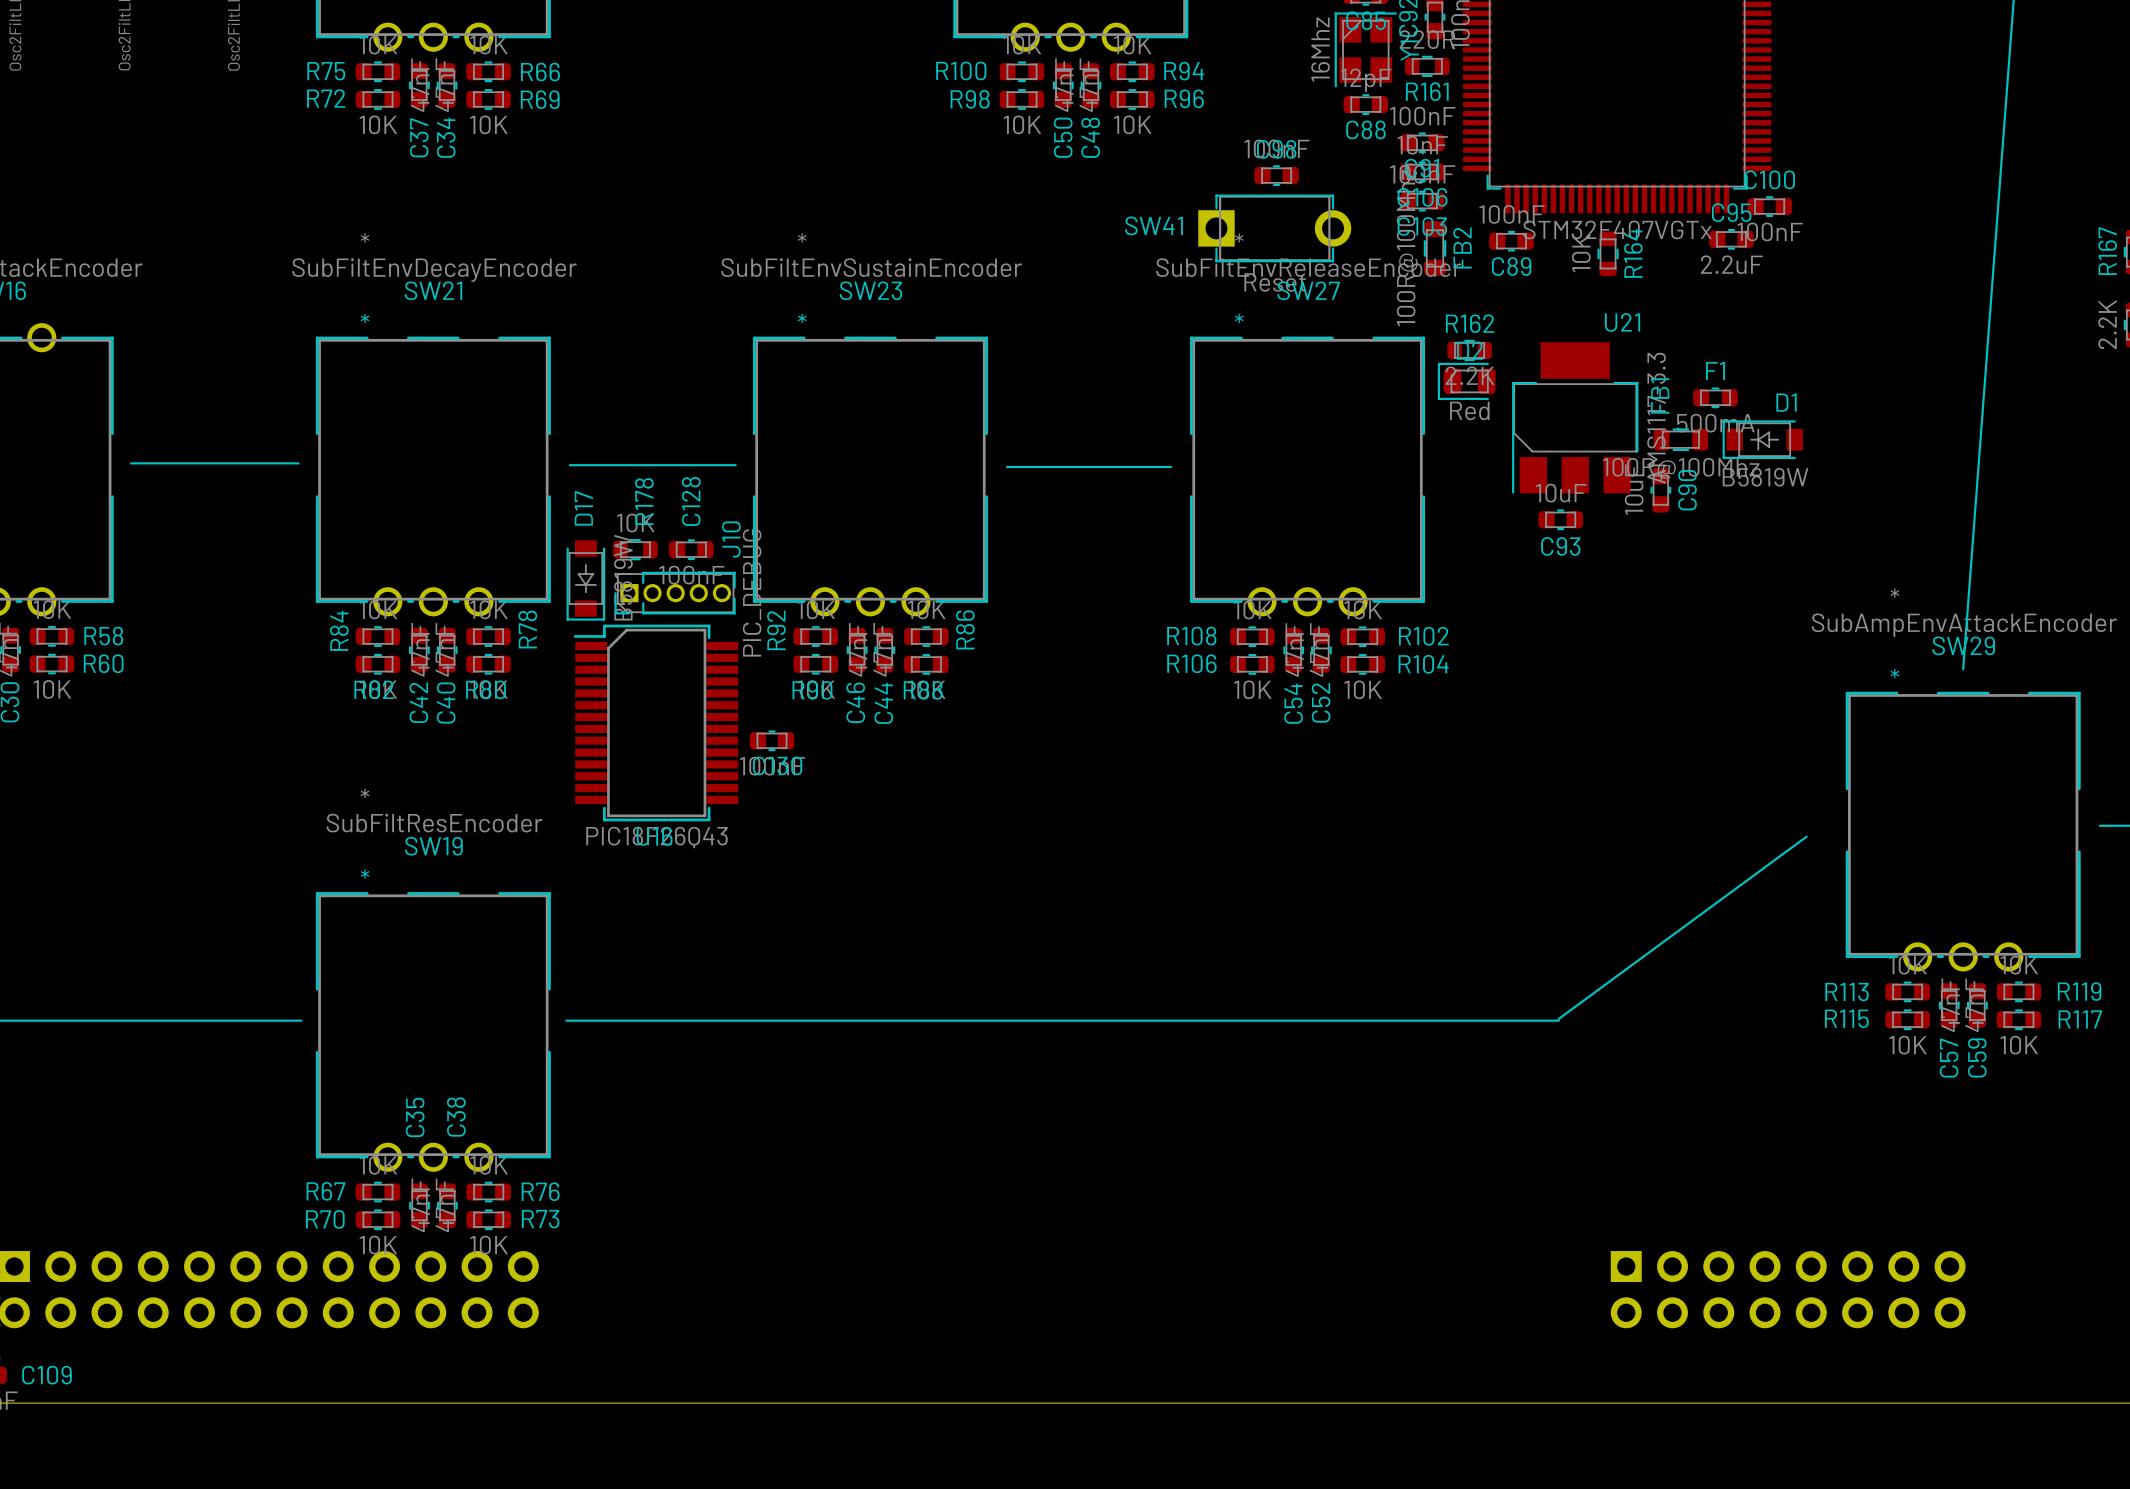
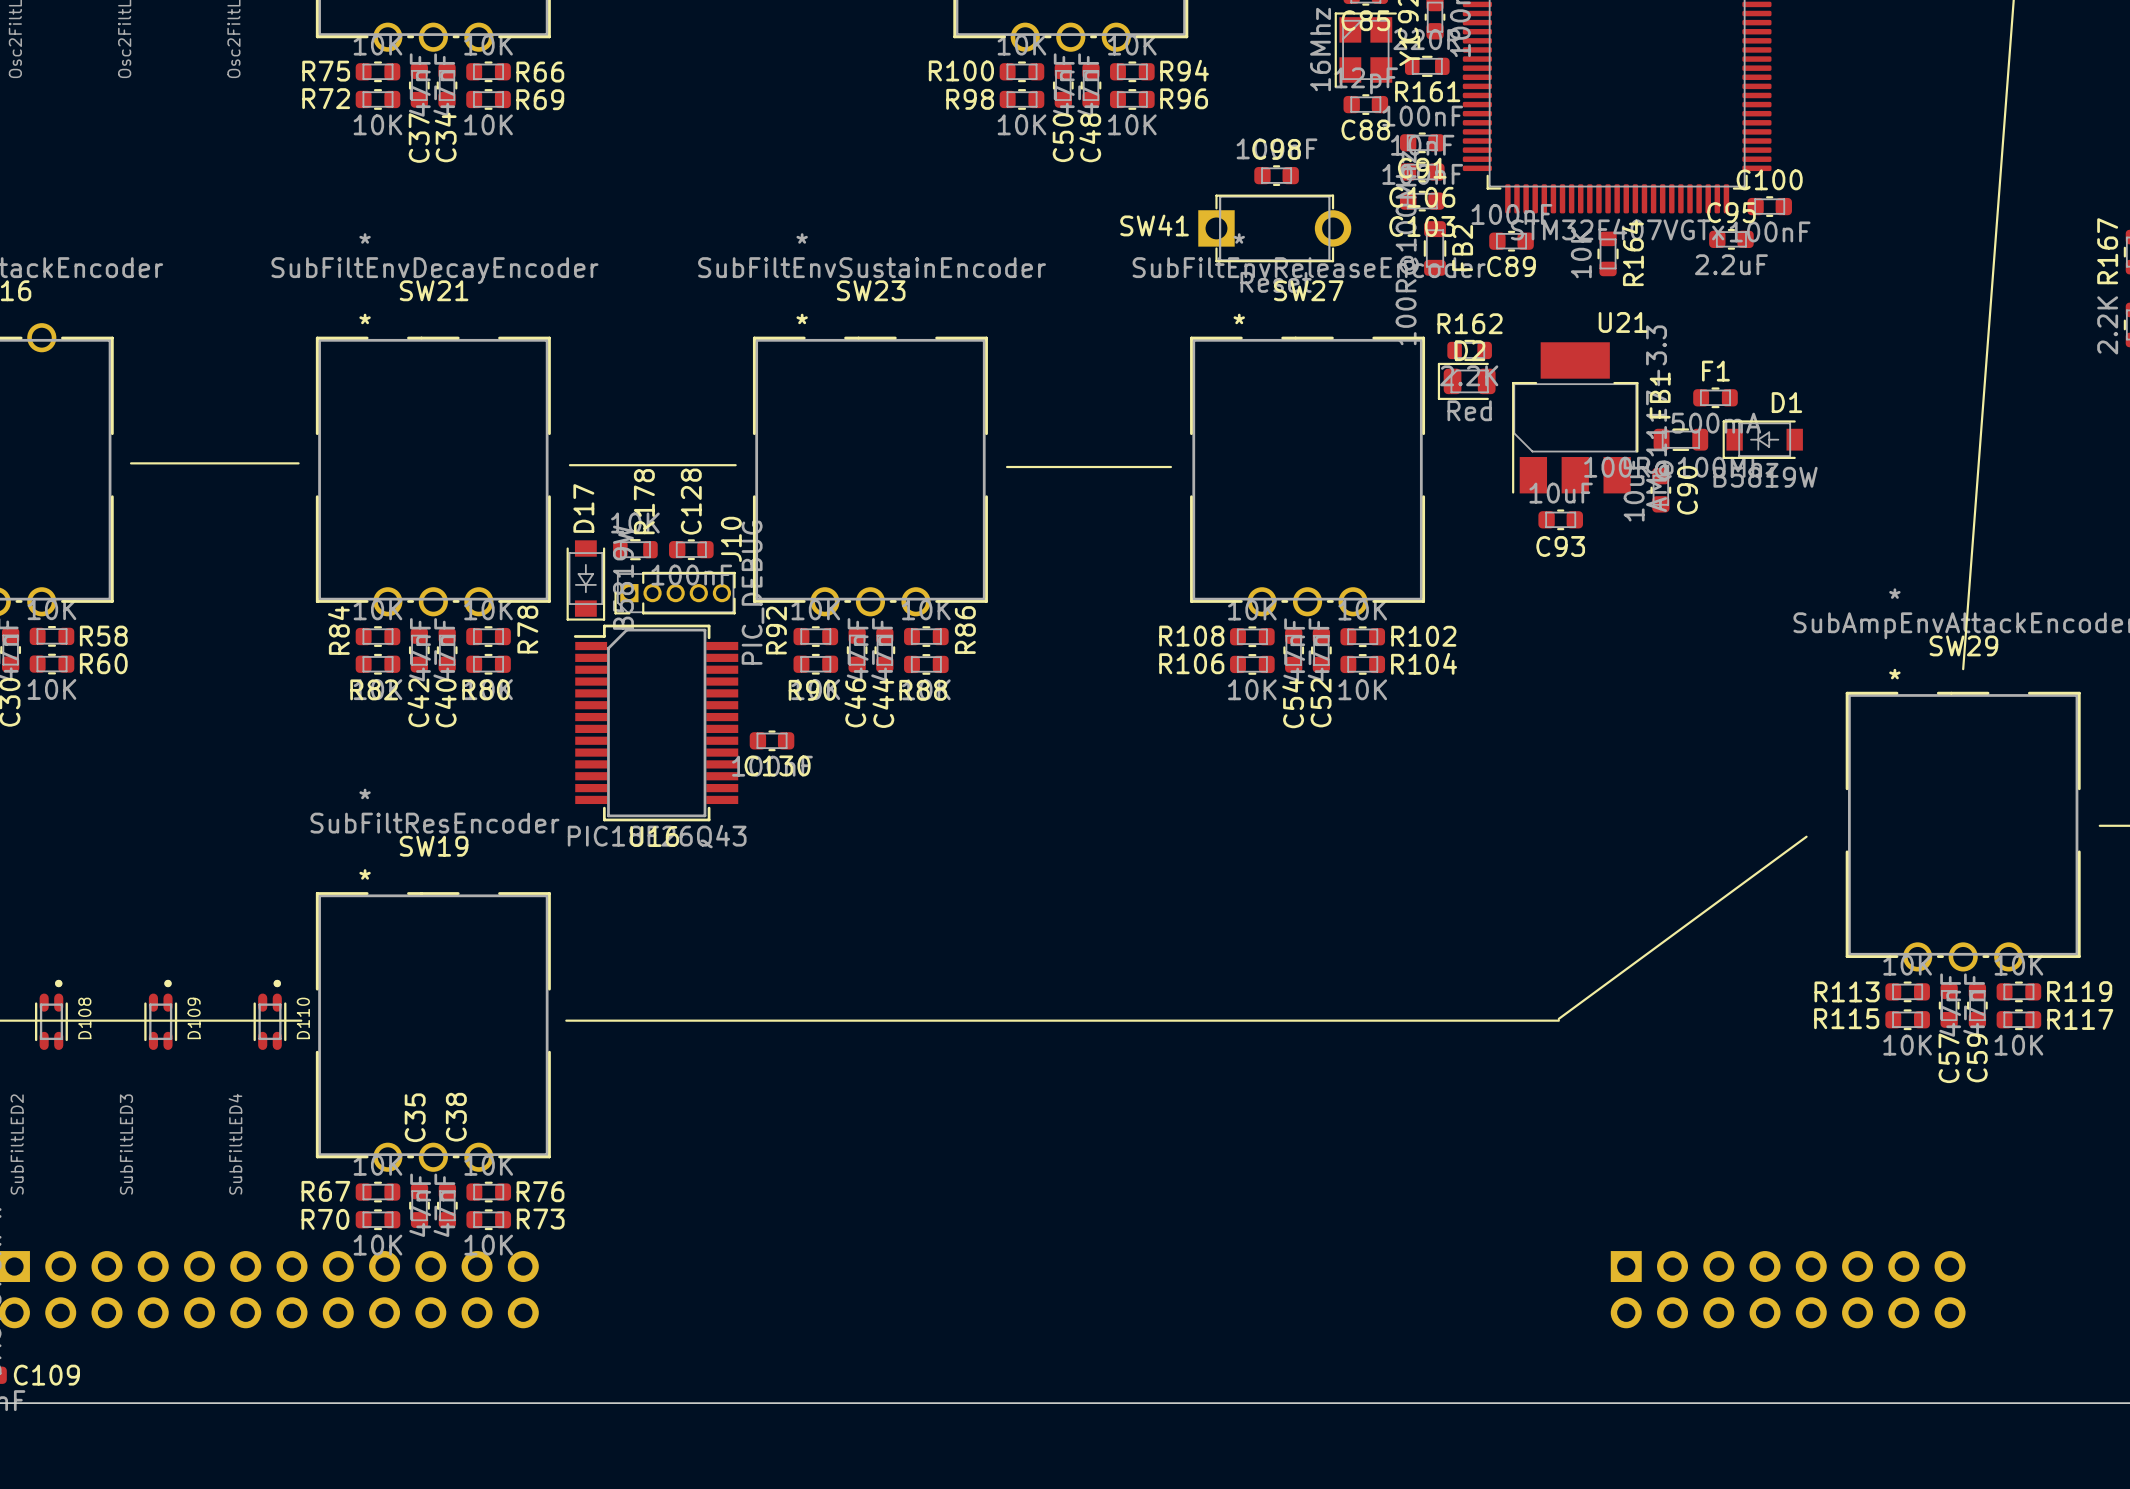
D108: none -> SubFiltLED2 (51, 1014)
D109: none -> SubFiltLED3 (160, 1014)
D110: none -> SubFiltLED4 (269, 1014)

